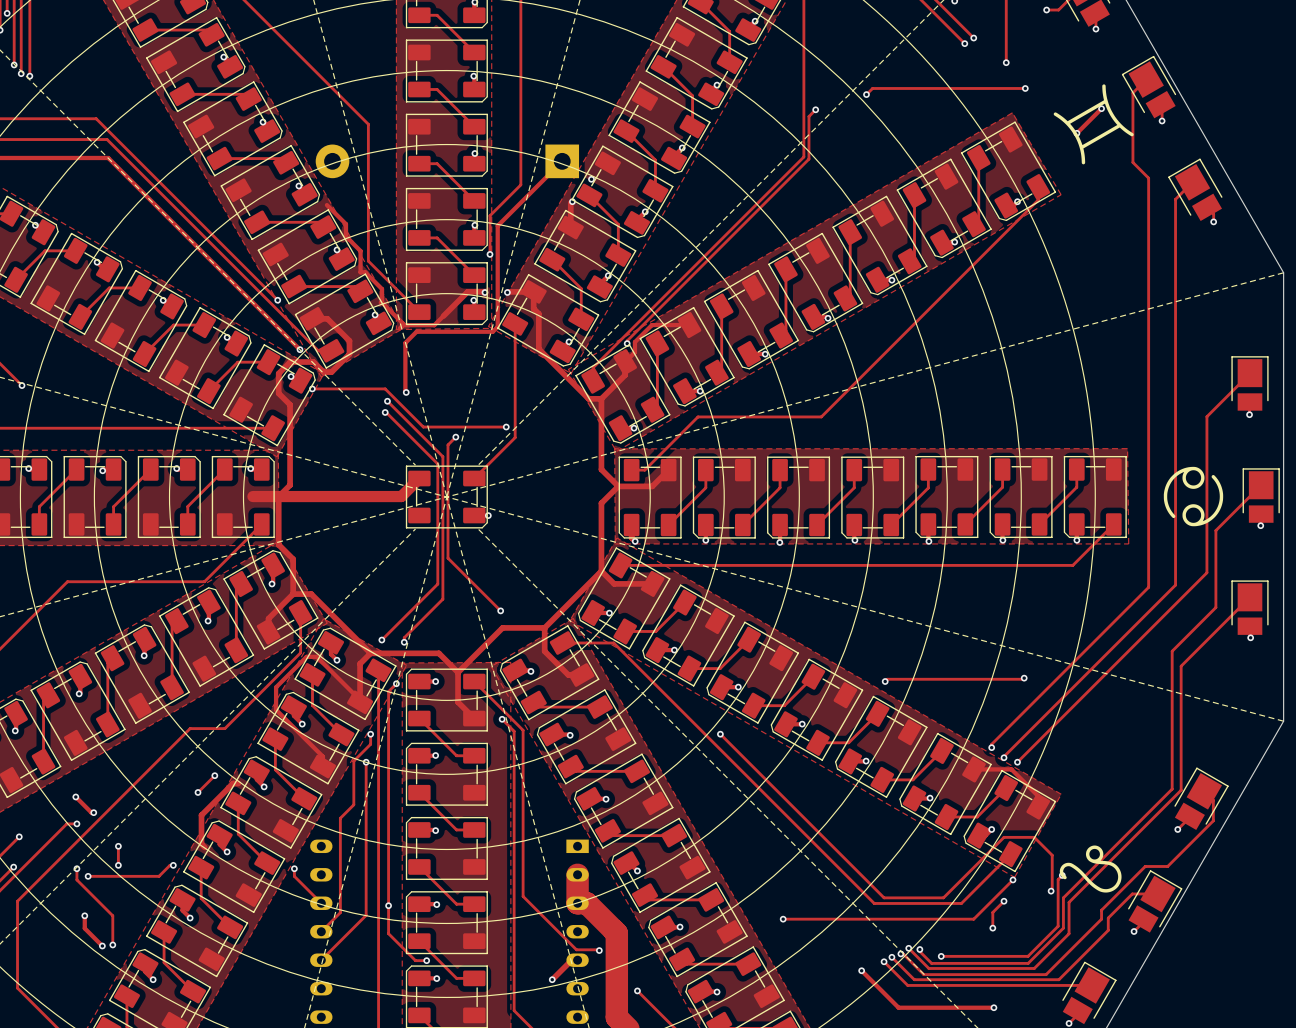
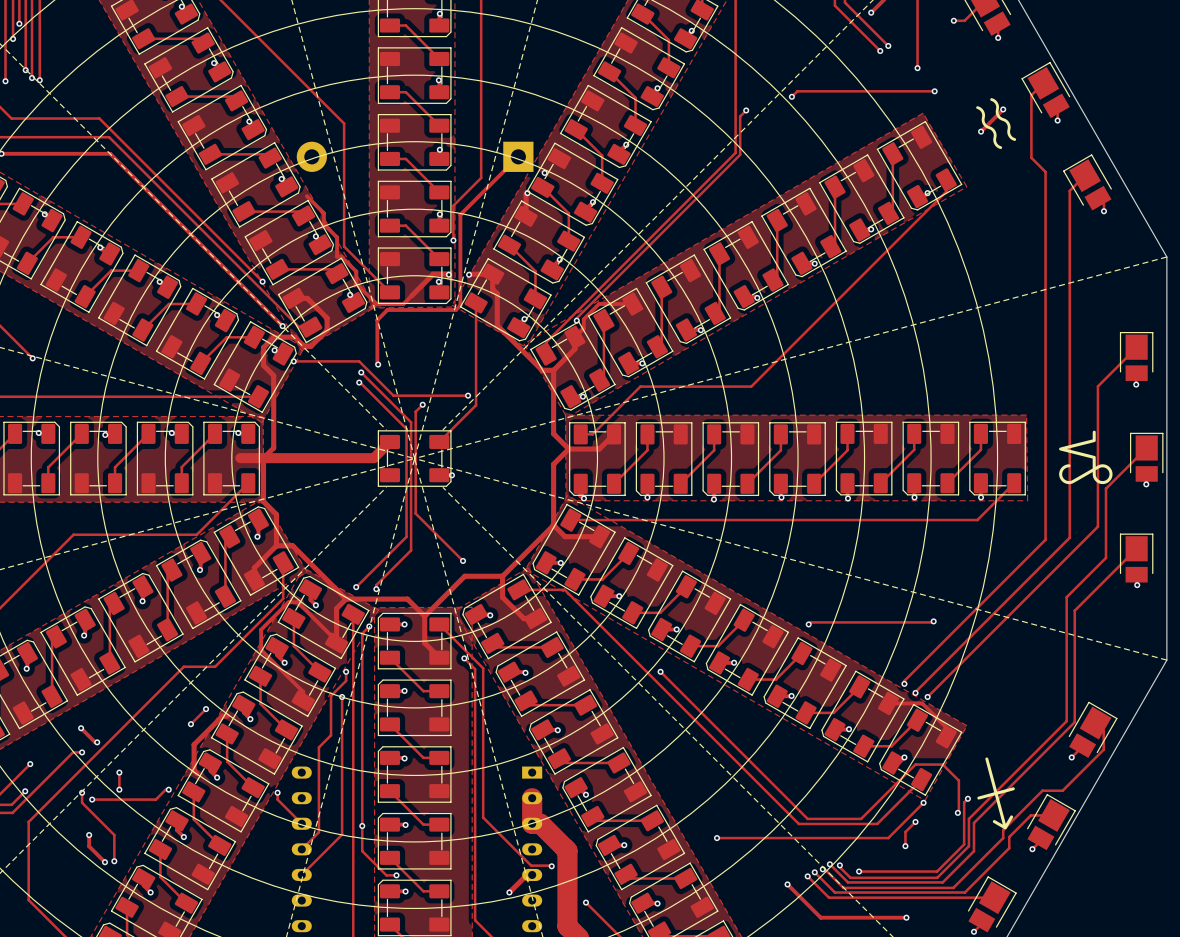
drawing shape: [1053, 84, 1134, 165] -> [976, 98, 1017, 149]
drawing shape: [1163, 466, 1224, 527] -> [1059, 430, 1113, 485]
drawing shape: [1059, 845, 1122, 893] -> [977, 757, 1015, 830]

